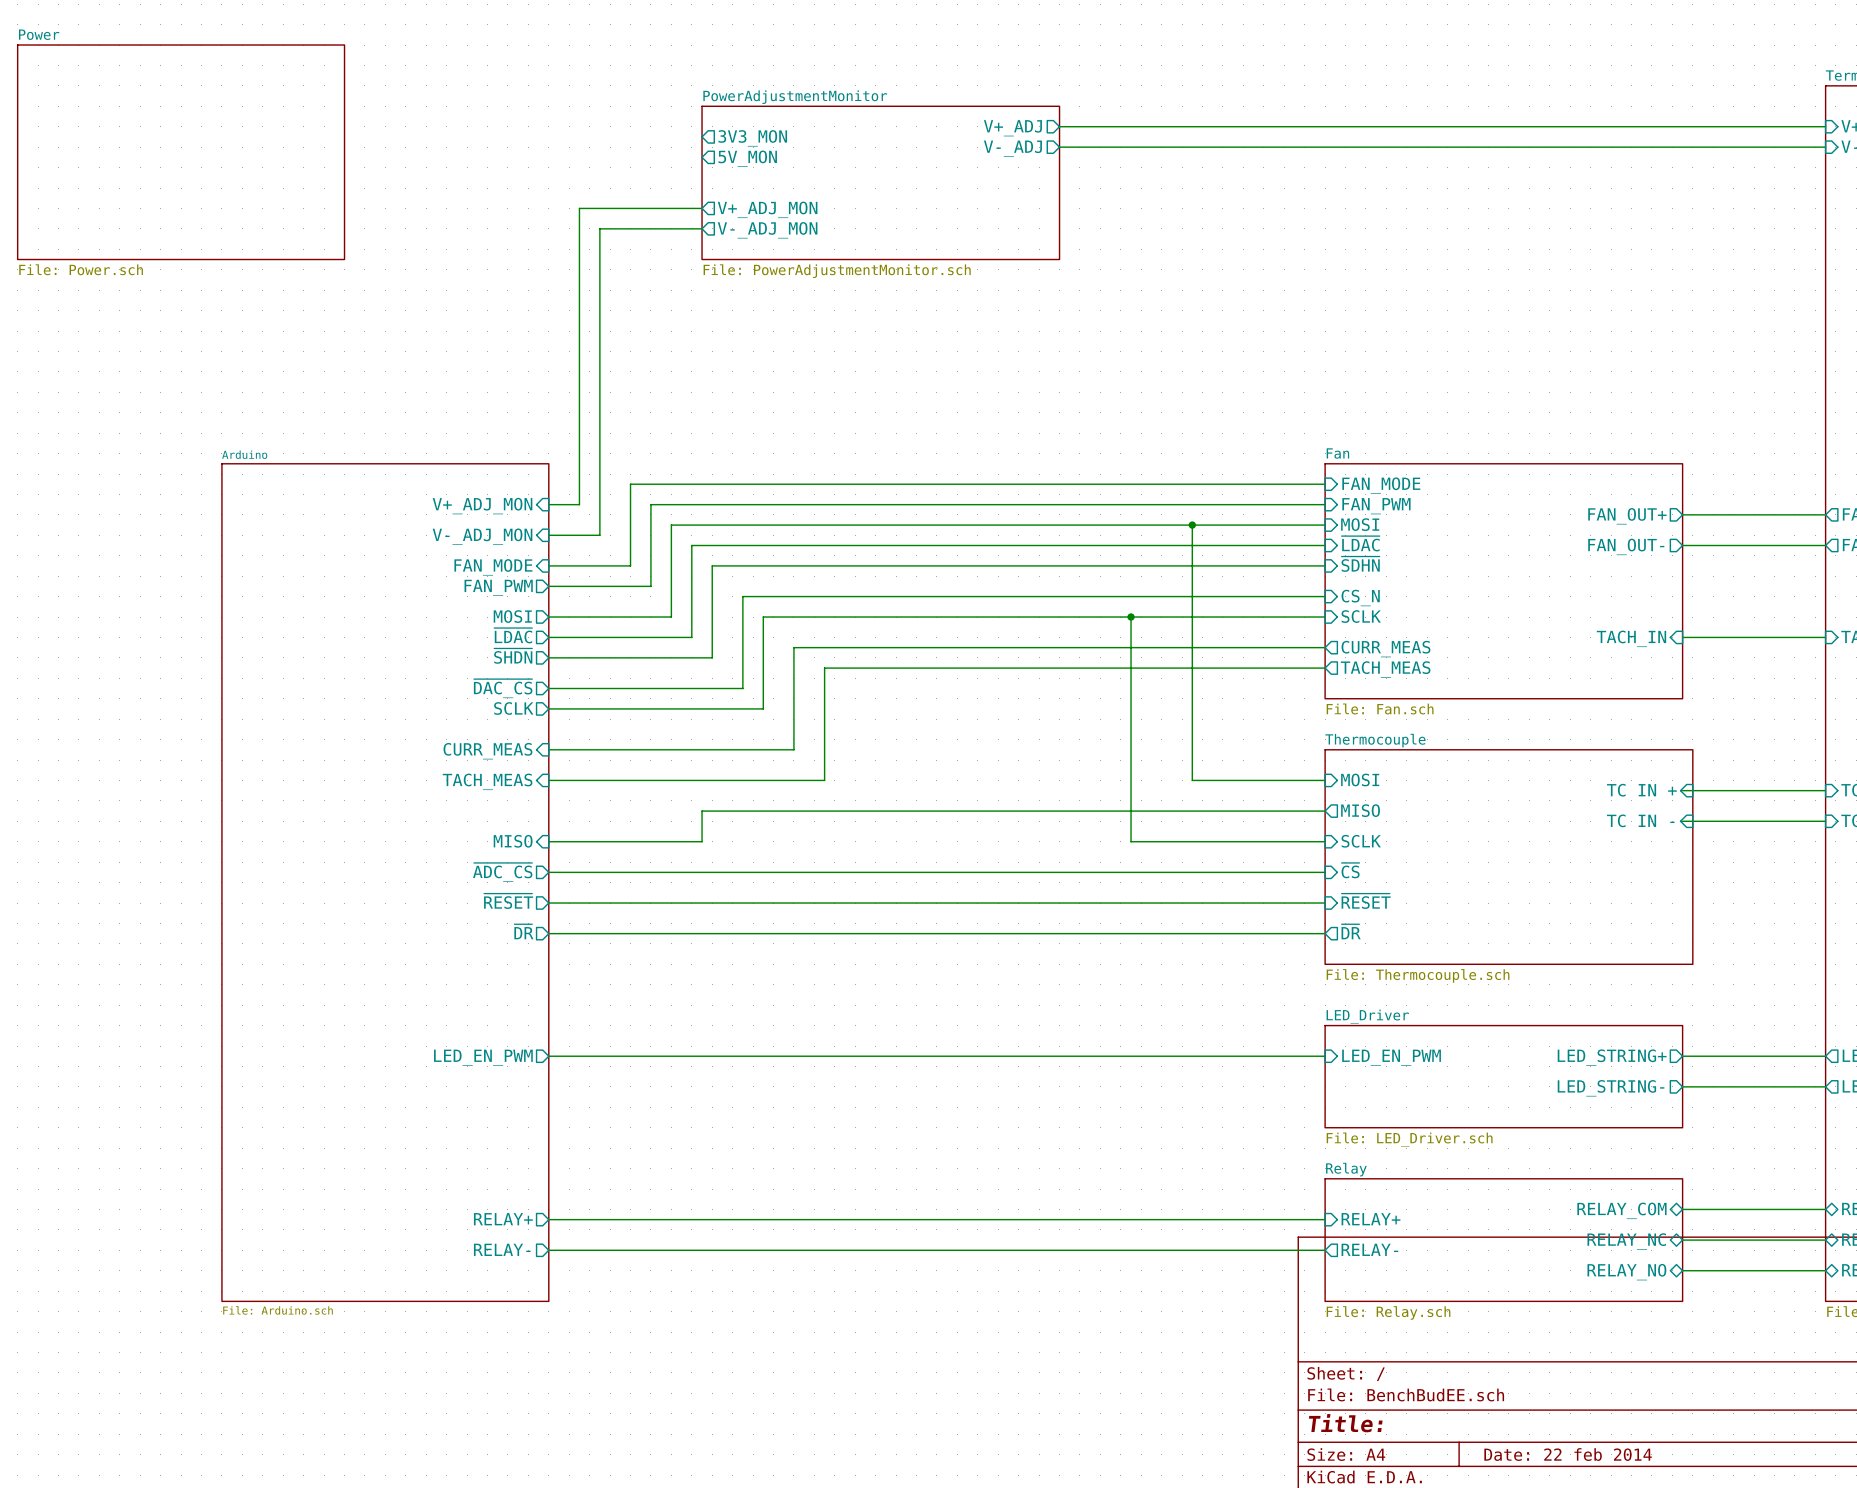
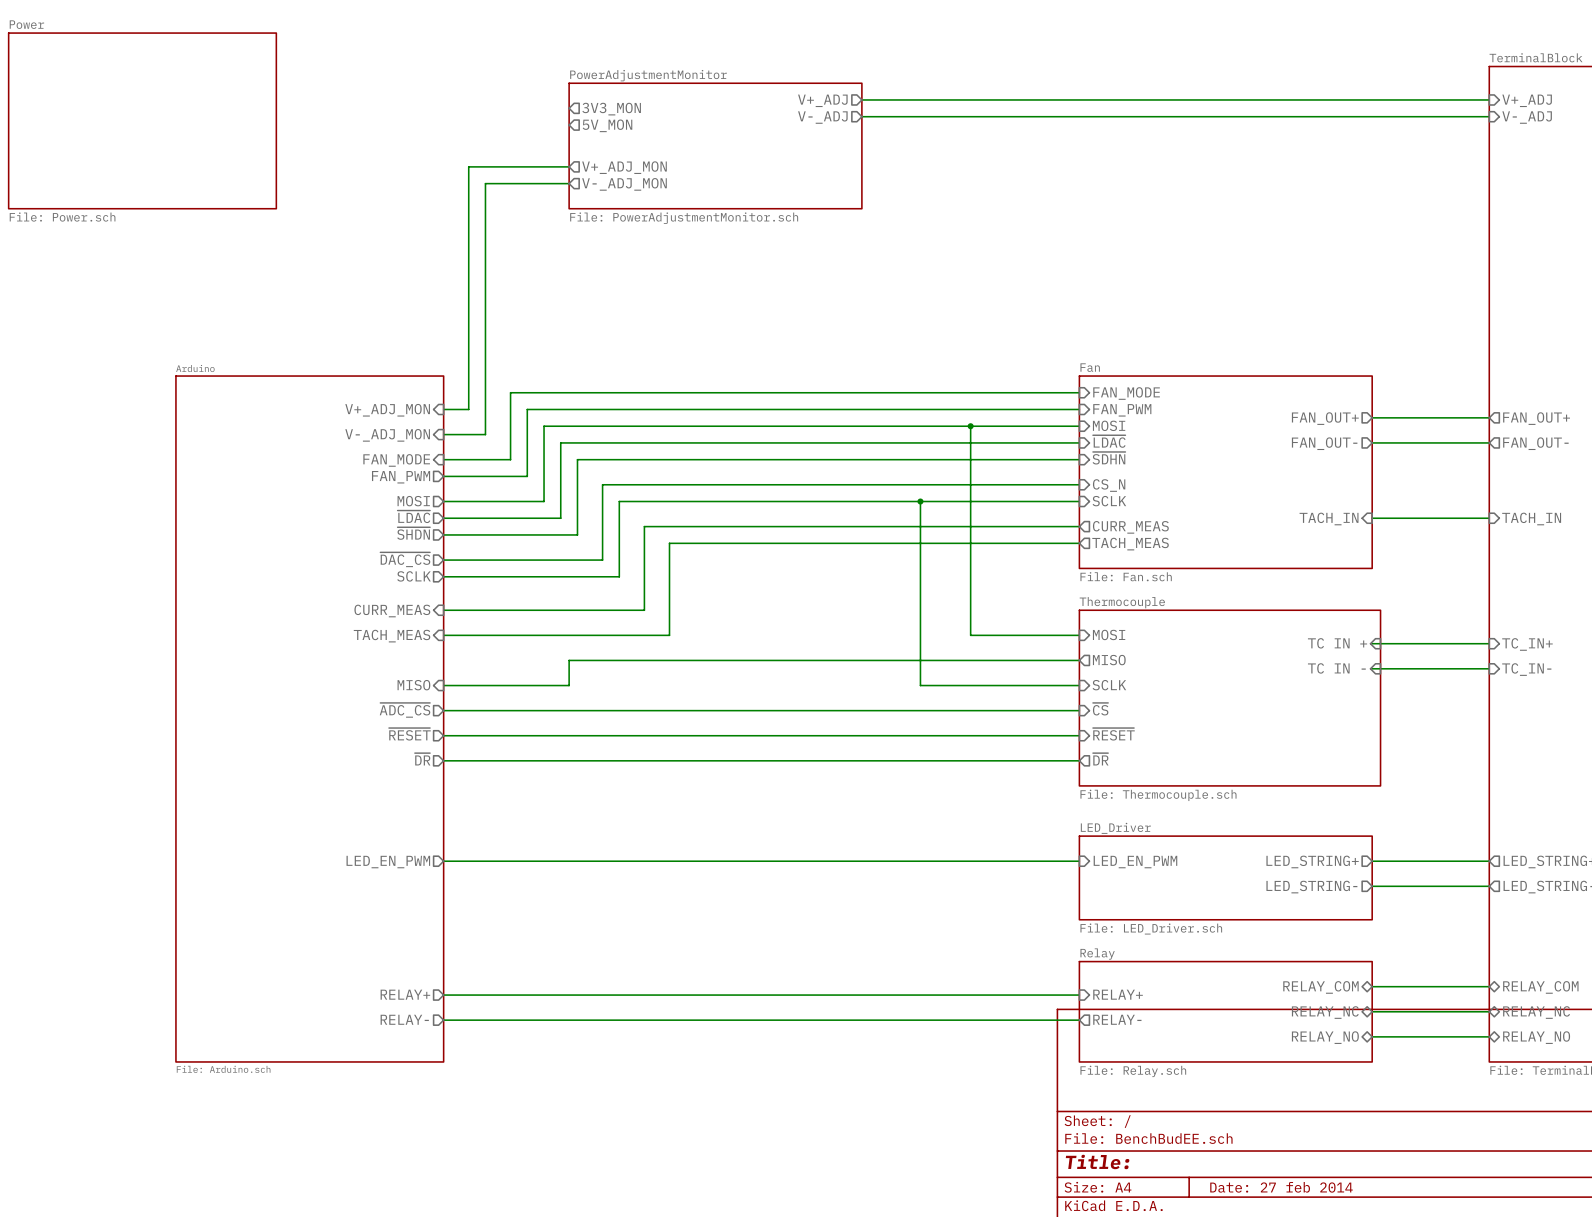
title block: Date: 22 feb 2014 (1568, 1454) -> Date: 27 feb 2014 (1281, 1187)

